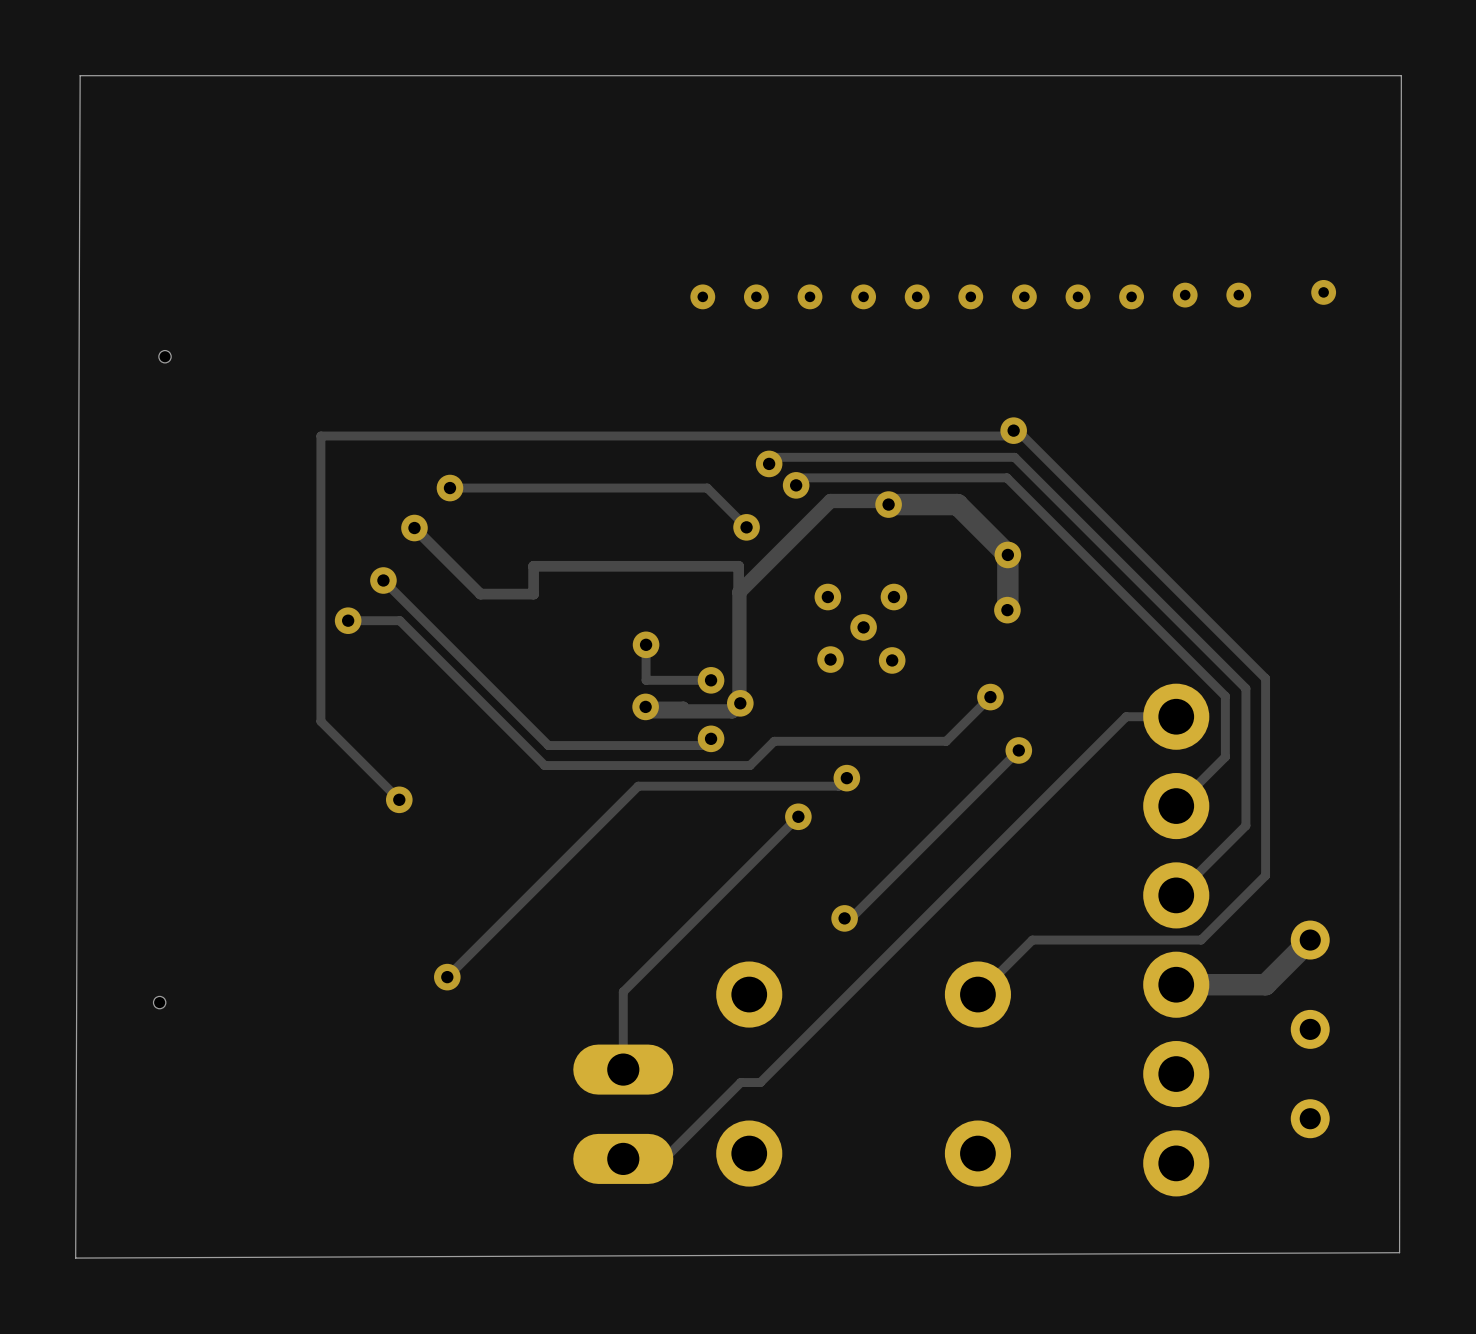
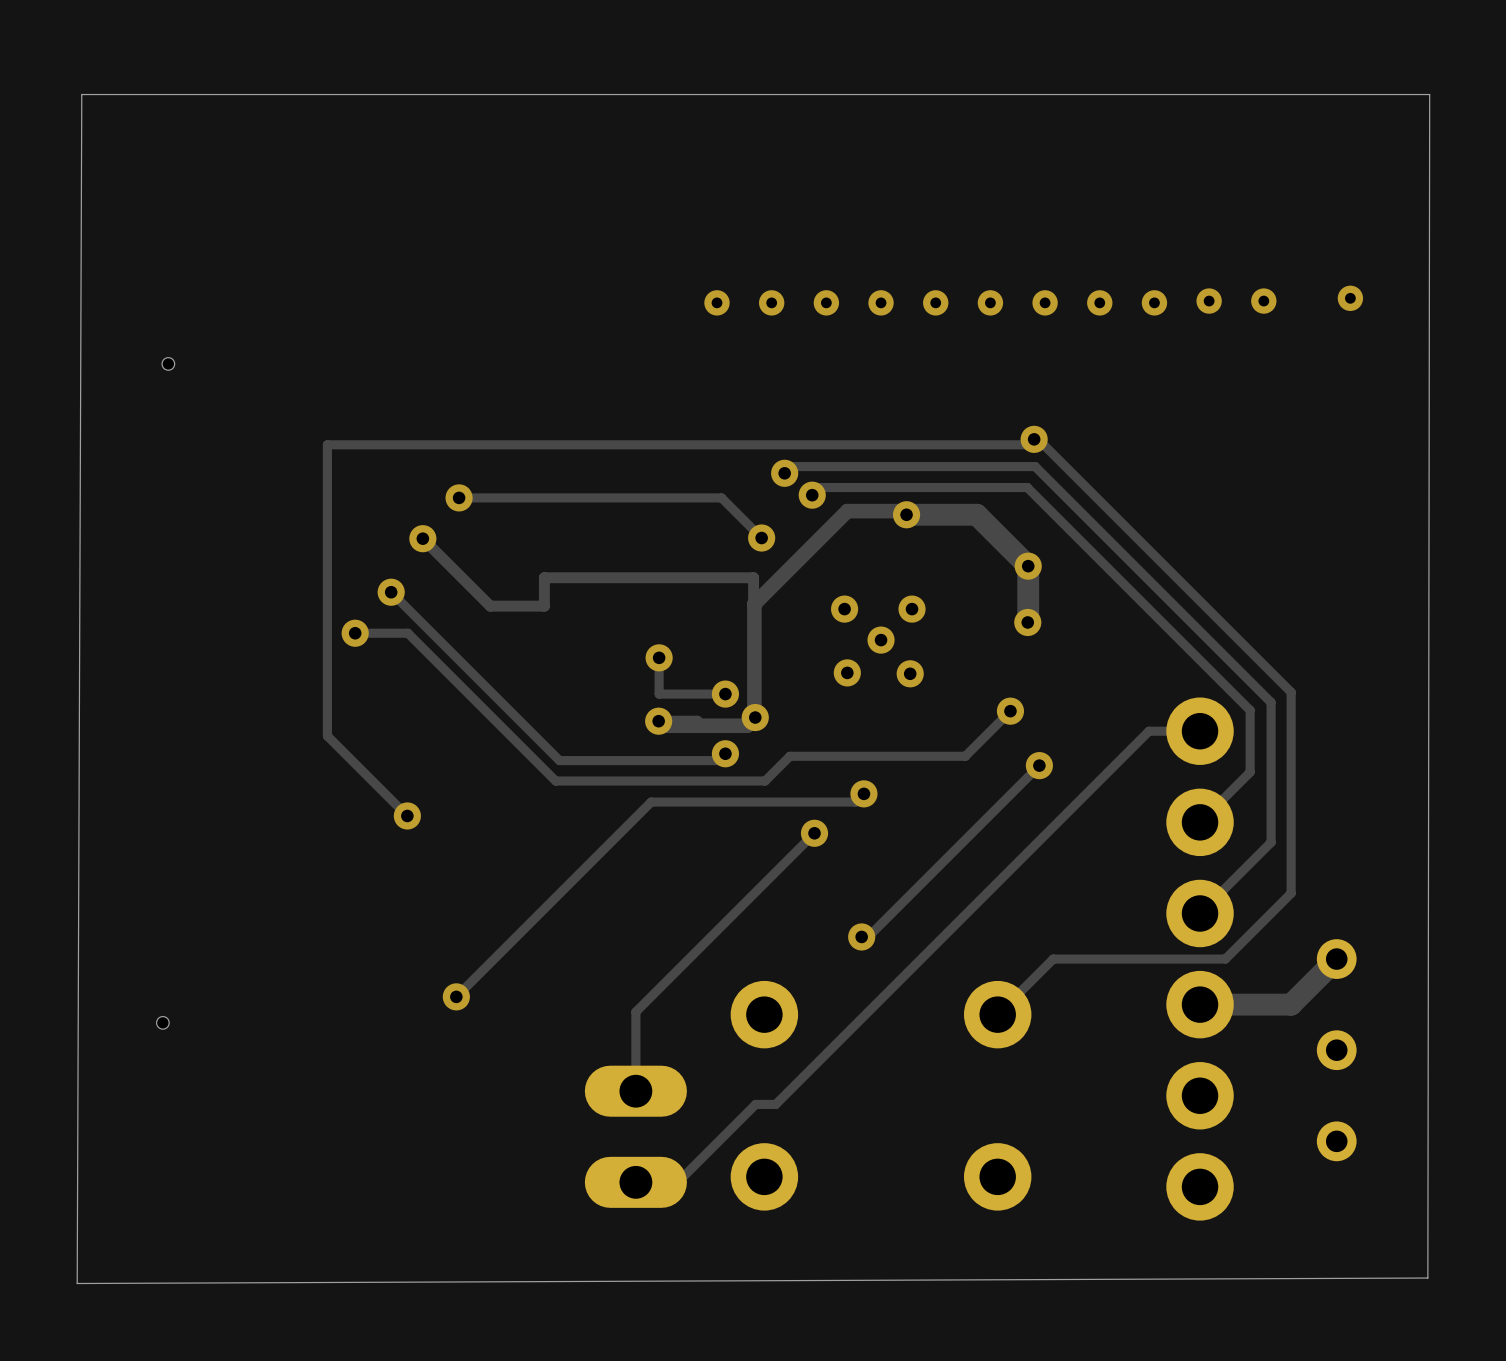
board edge: (1401, 92) (1401, 75) (80, 75) (80, 92) -> (1429, 94) (81, 94)

